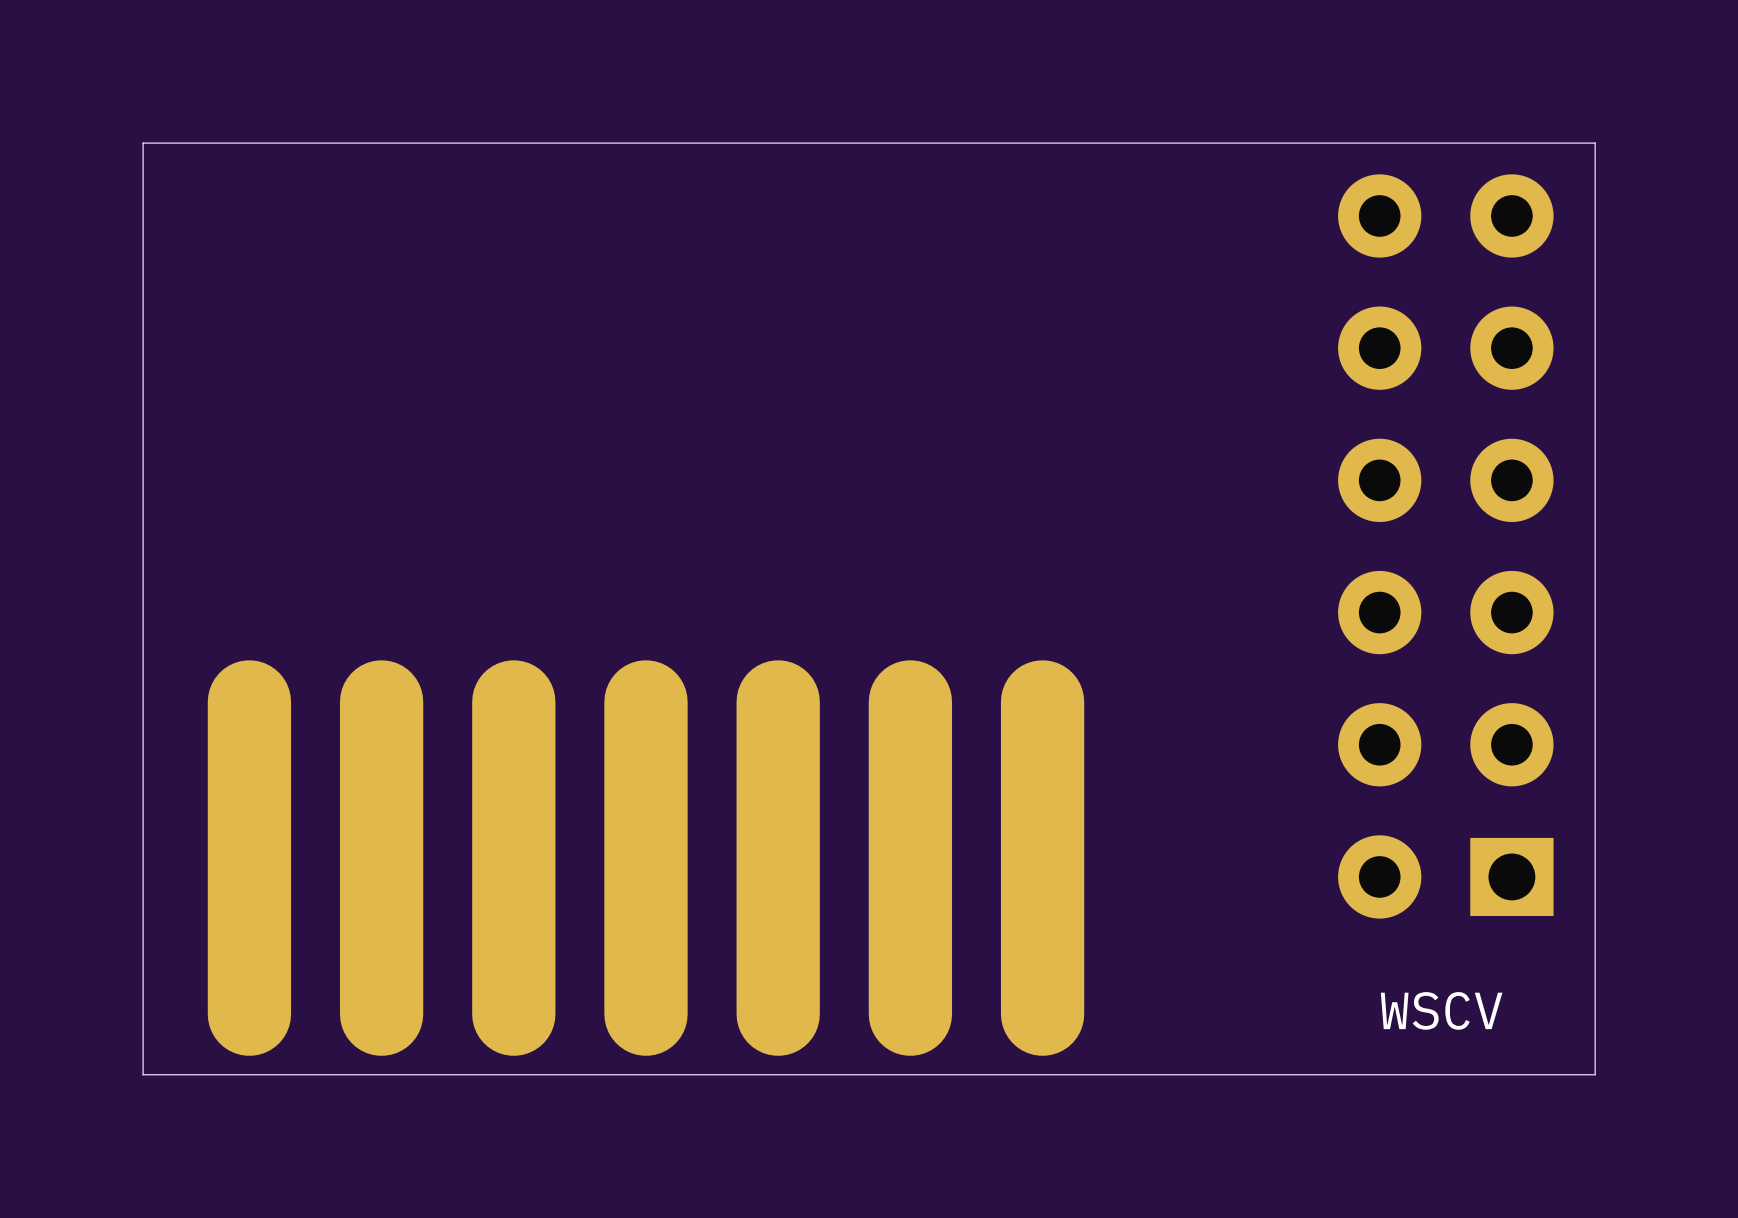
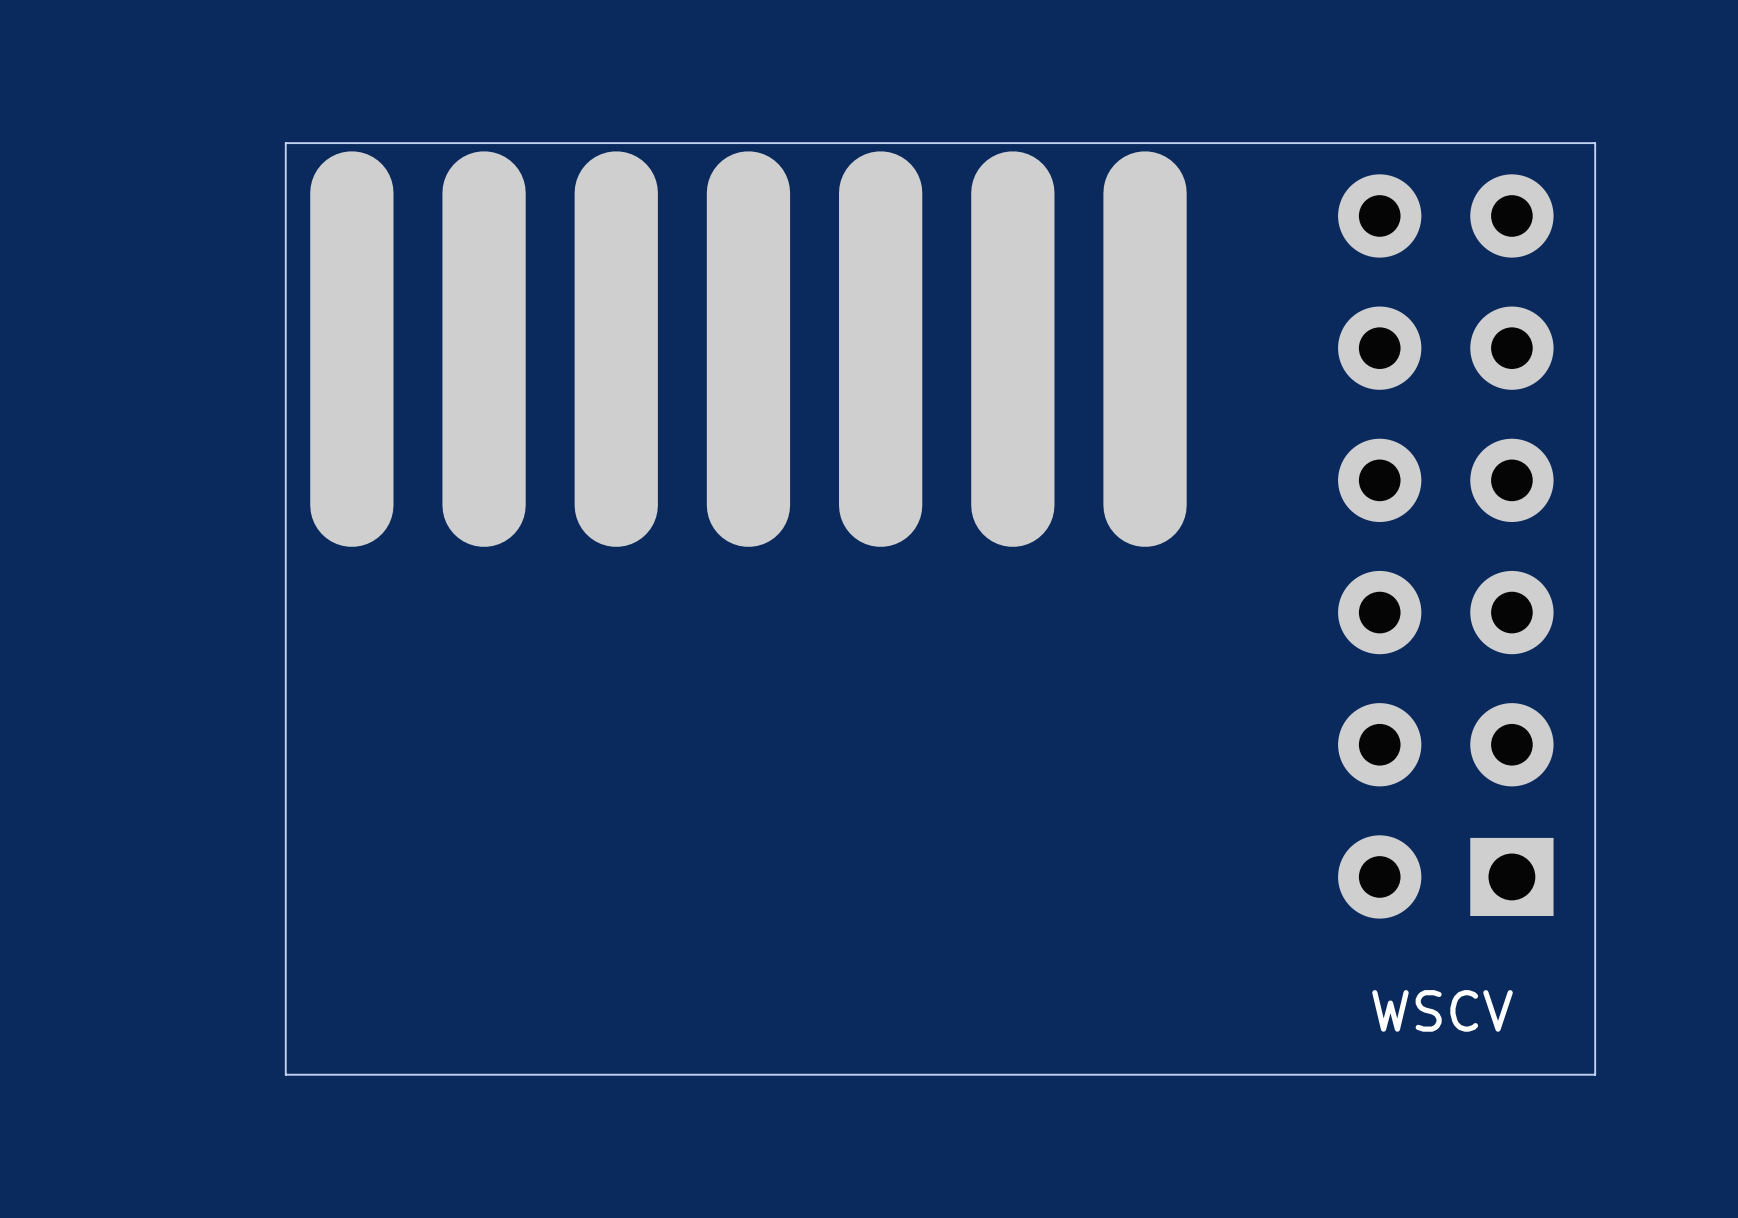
board edge: (285, 143) (143, 143) (143, 1074) (285, 1074) -> (285, 143) (285, 1074)
part position: (646, 858) -> (748, 349)

